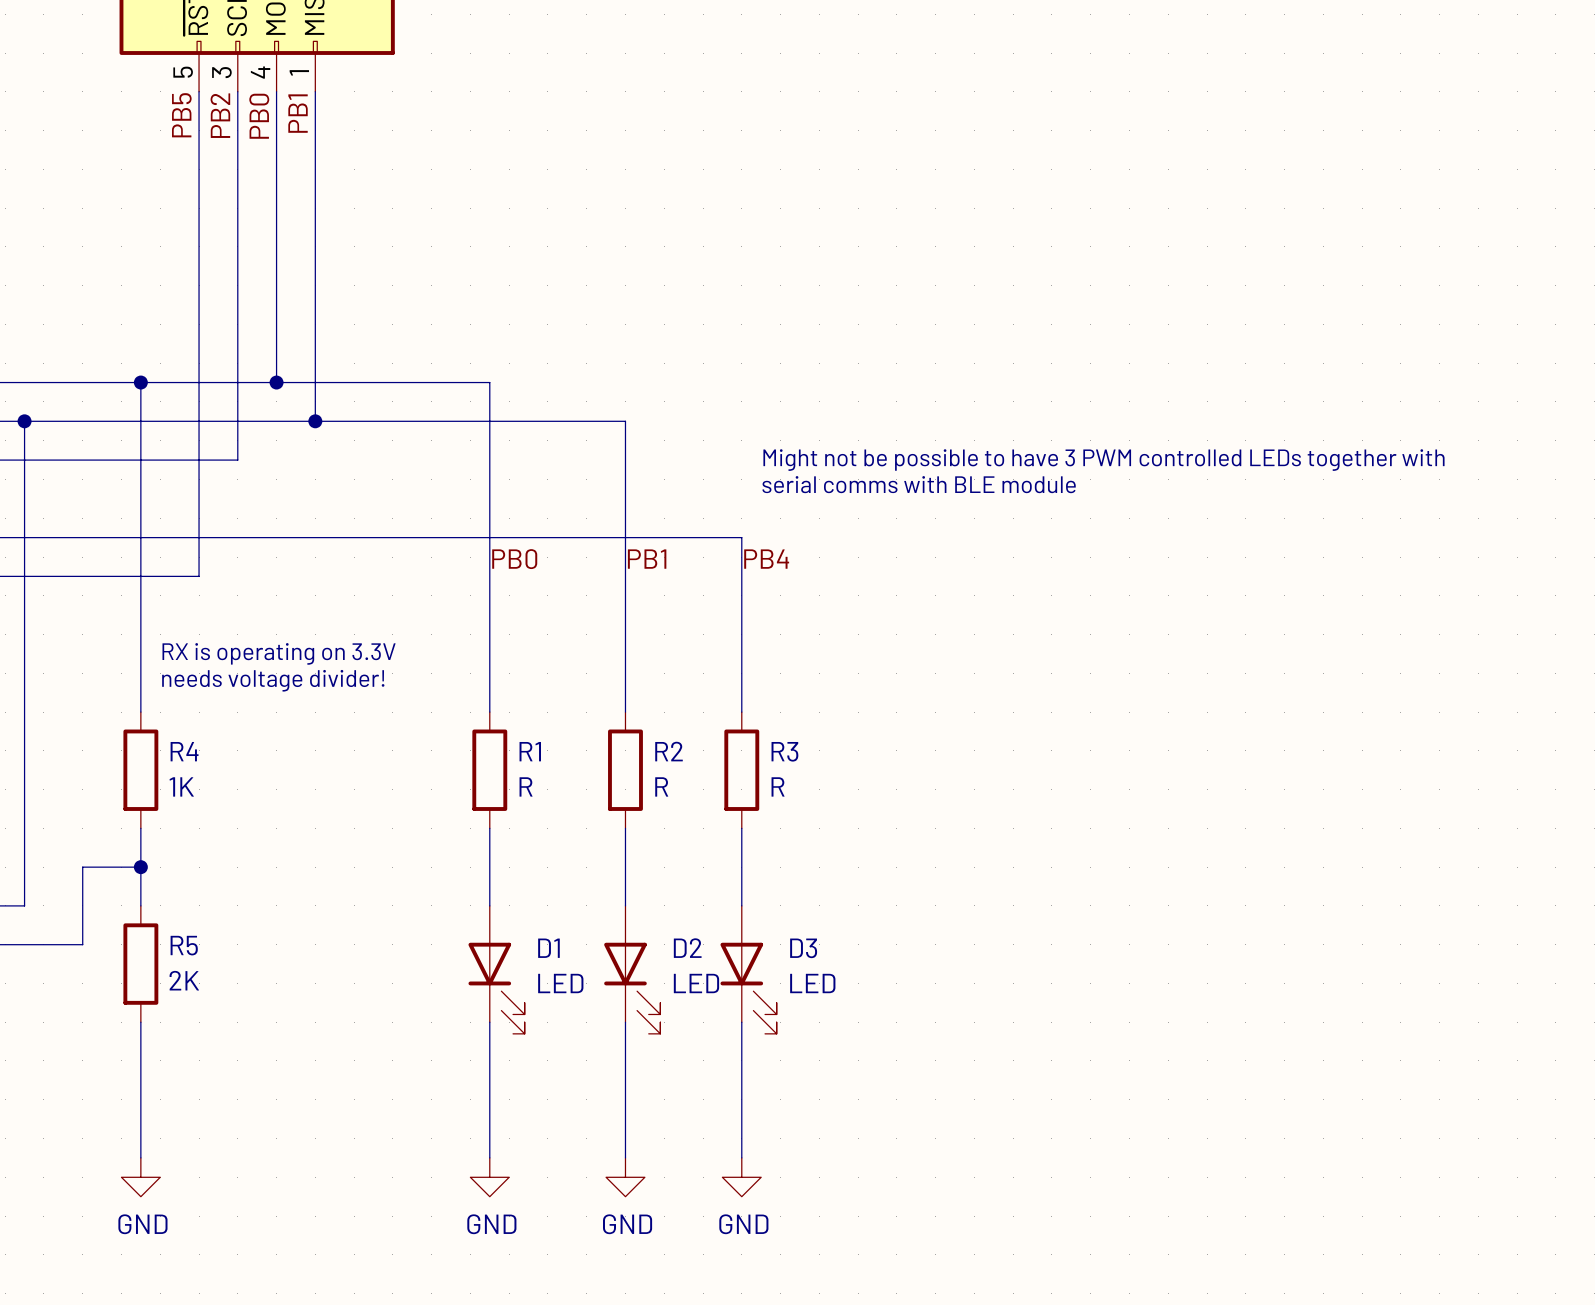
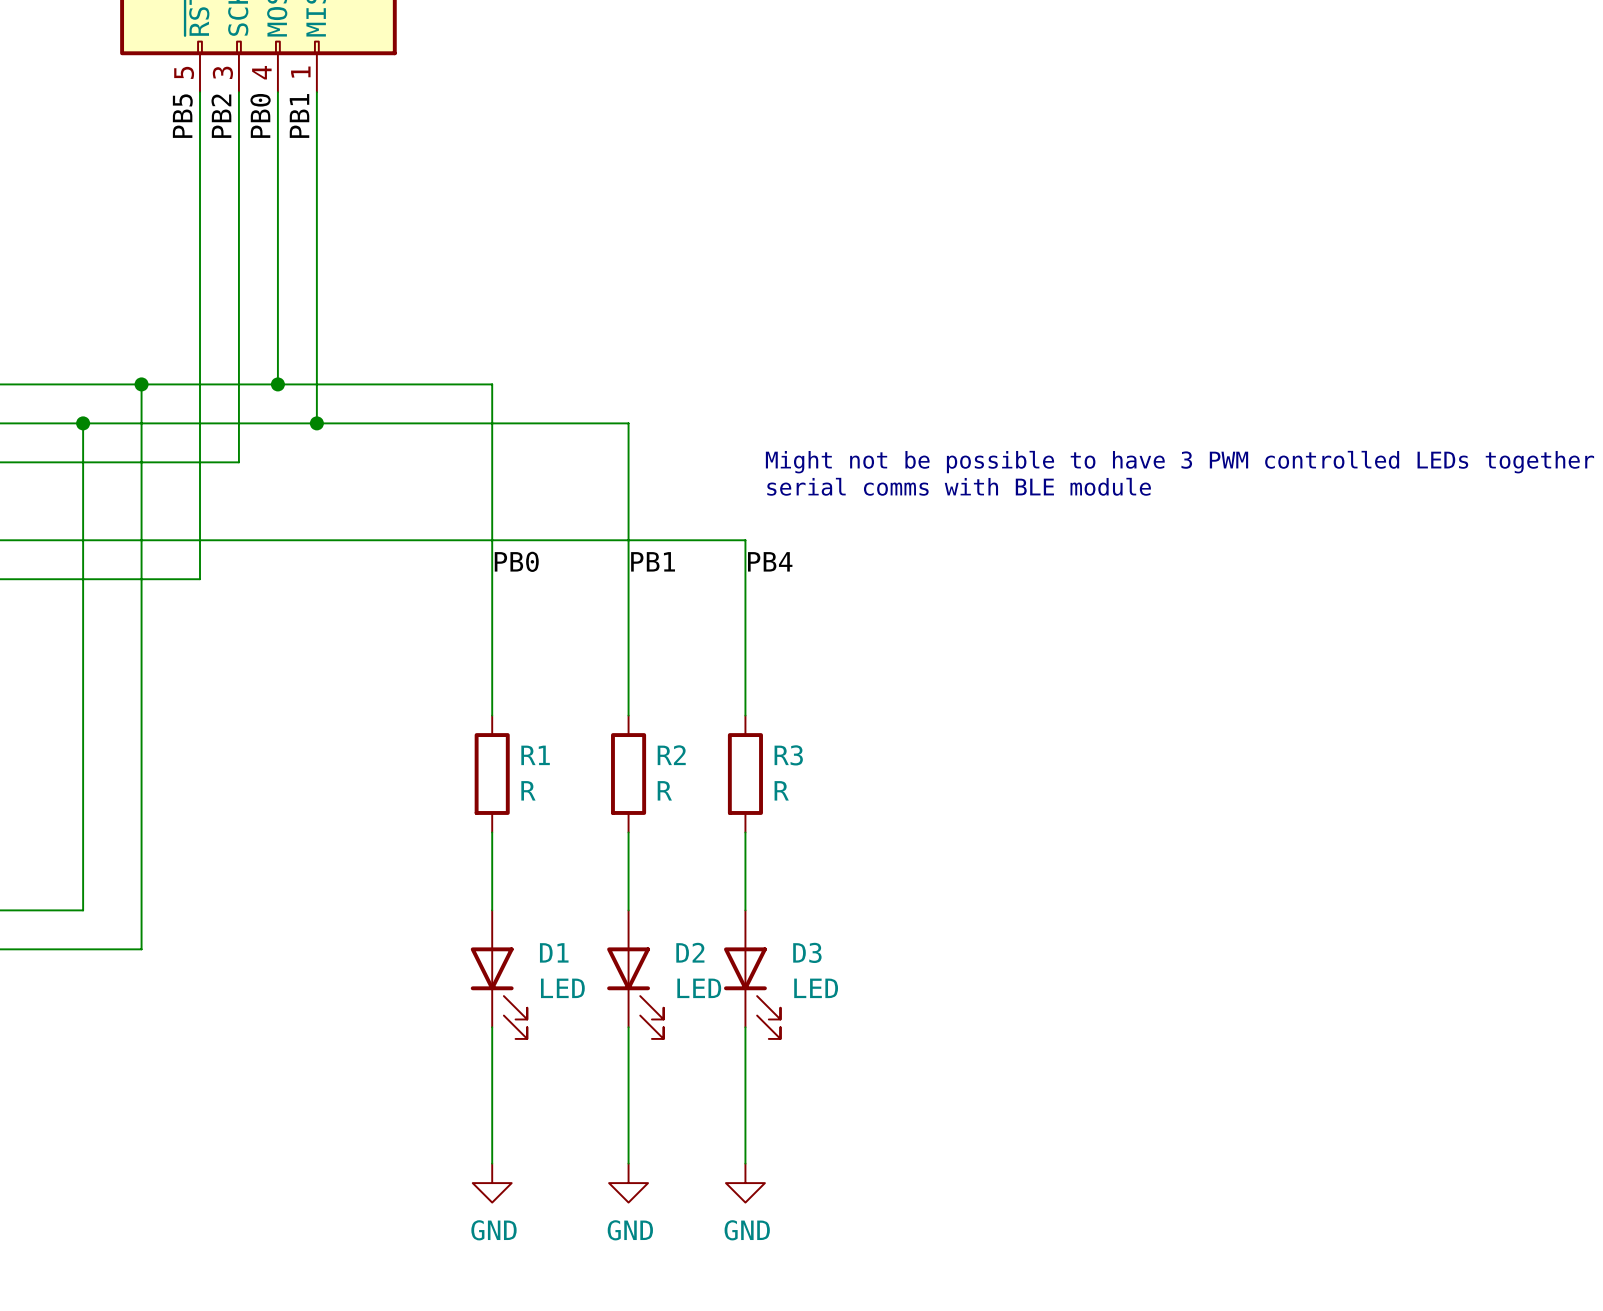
wire: (24, 421) (24, 905) -> (83, 910) (24, 910)
junction position: (24, 421) -> (83, 423)
text: RX is operating on 3.3V (279, 653) -> none
text: needs voltage divider! (273, 680) -> none
wire: none -> (141, 715) (141, 832)
R4: 1K (140, 770) -> none
wire: (82, 867) (140, 867) -> (83, 871) (83, 423)
junction: (140, 867) -> none
wire: (82, 905) (82, 944) -> (141, 910) (141, 949) (83, 949)
R5: 2K (140, 964) -> none
wire: (140, 1022) (140, 1157) -> none
power symbol: GND (140, 1177) -> none

